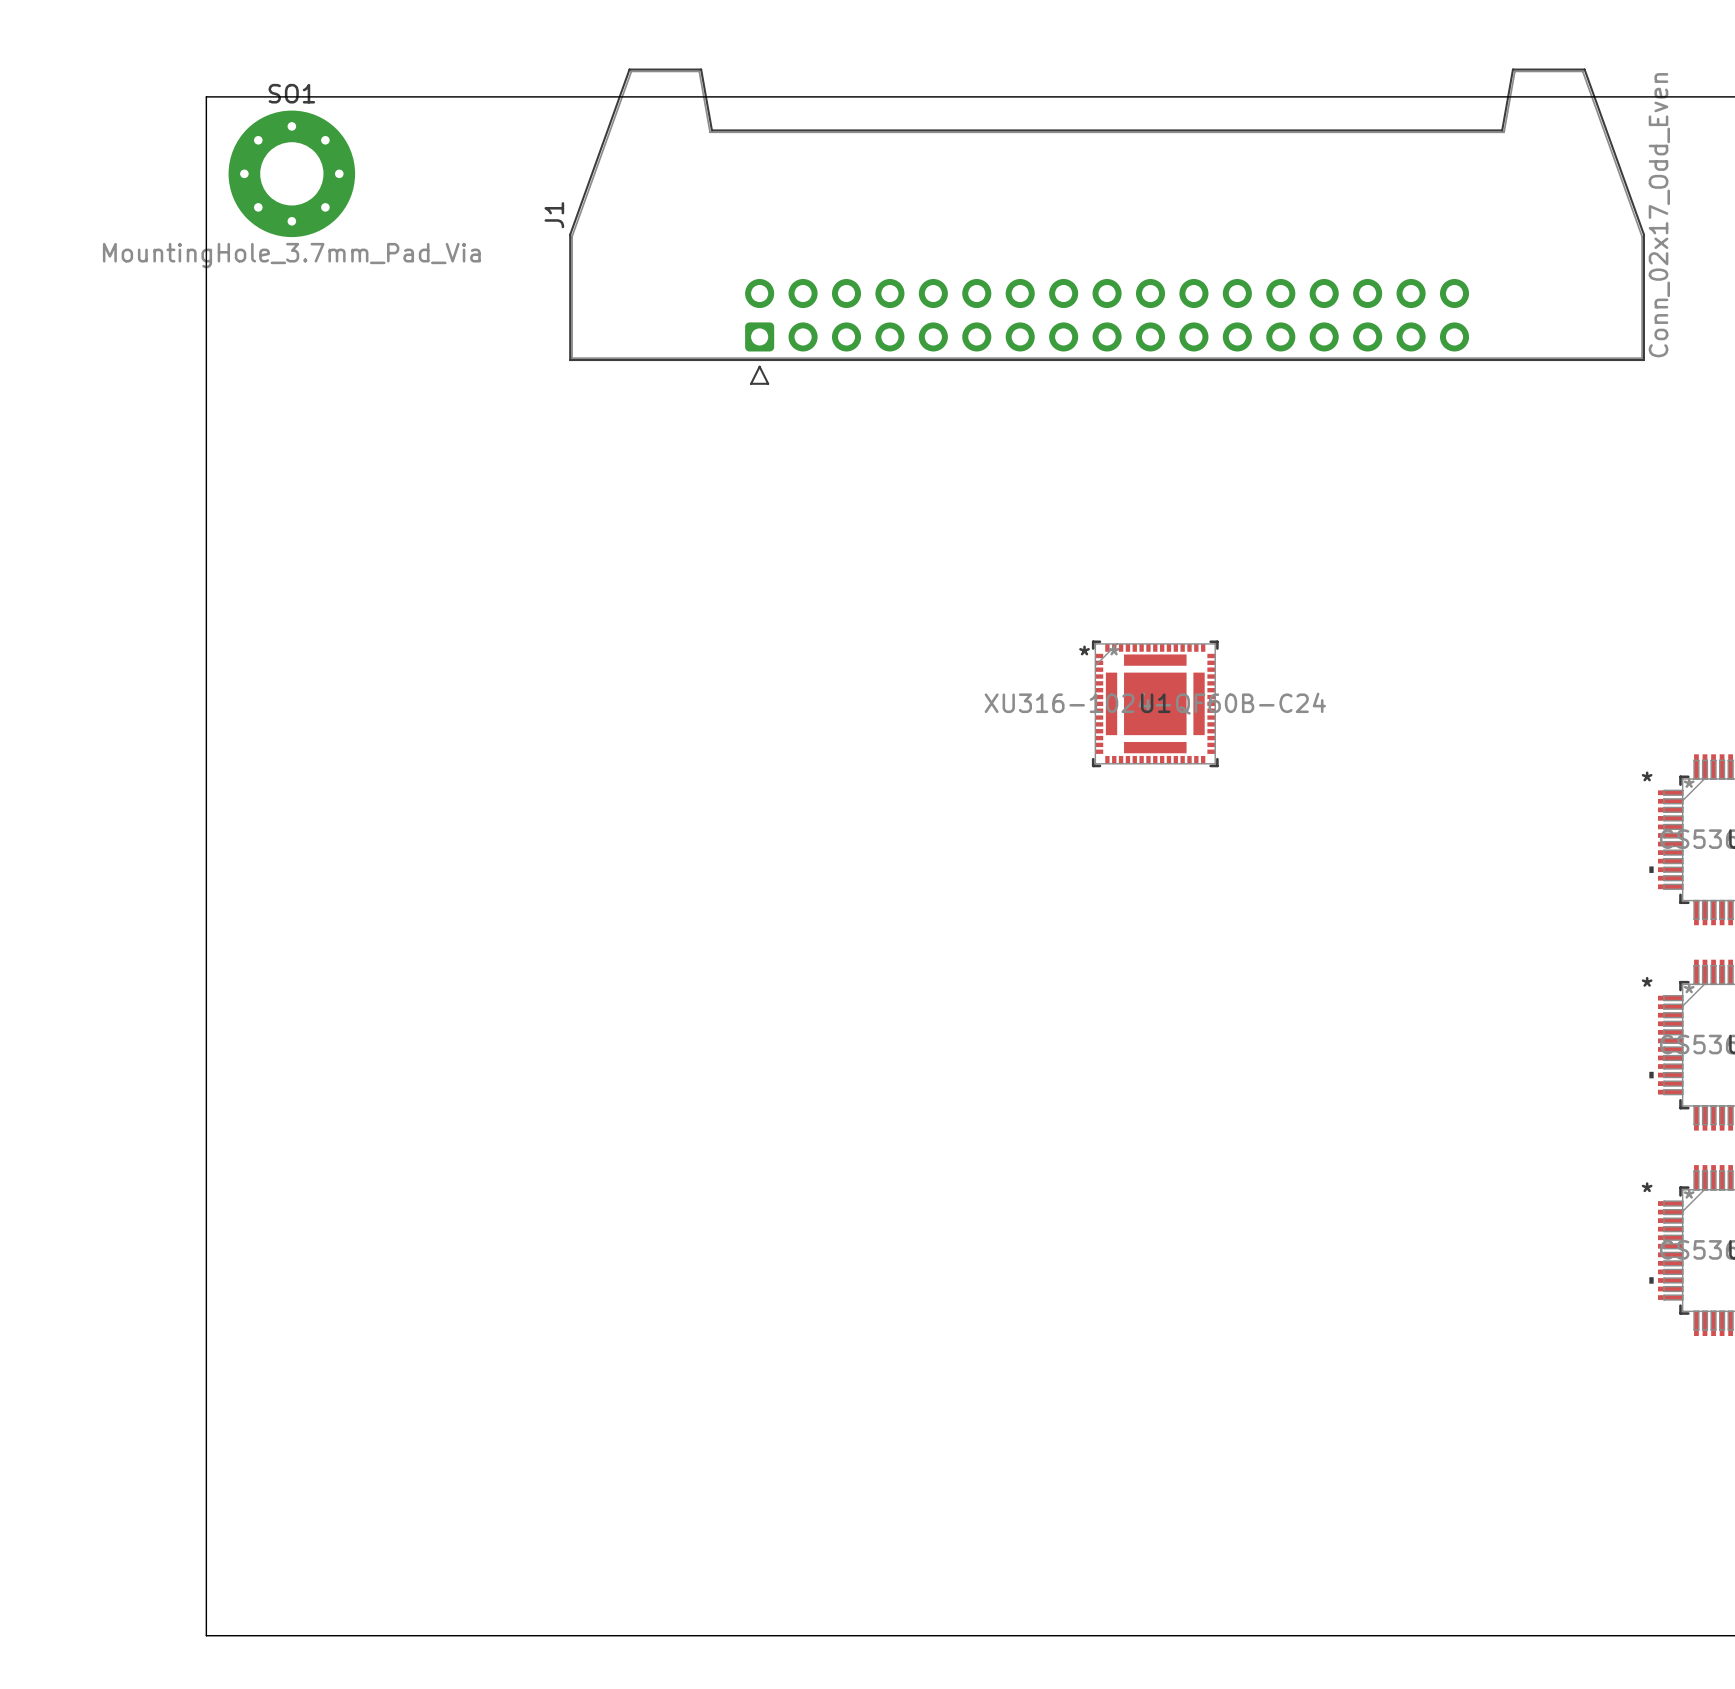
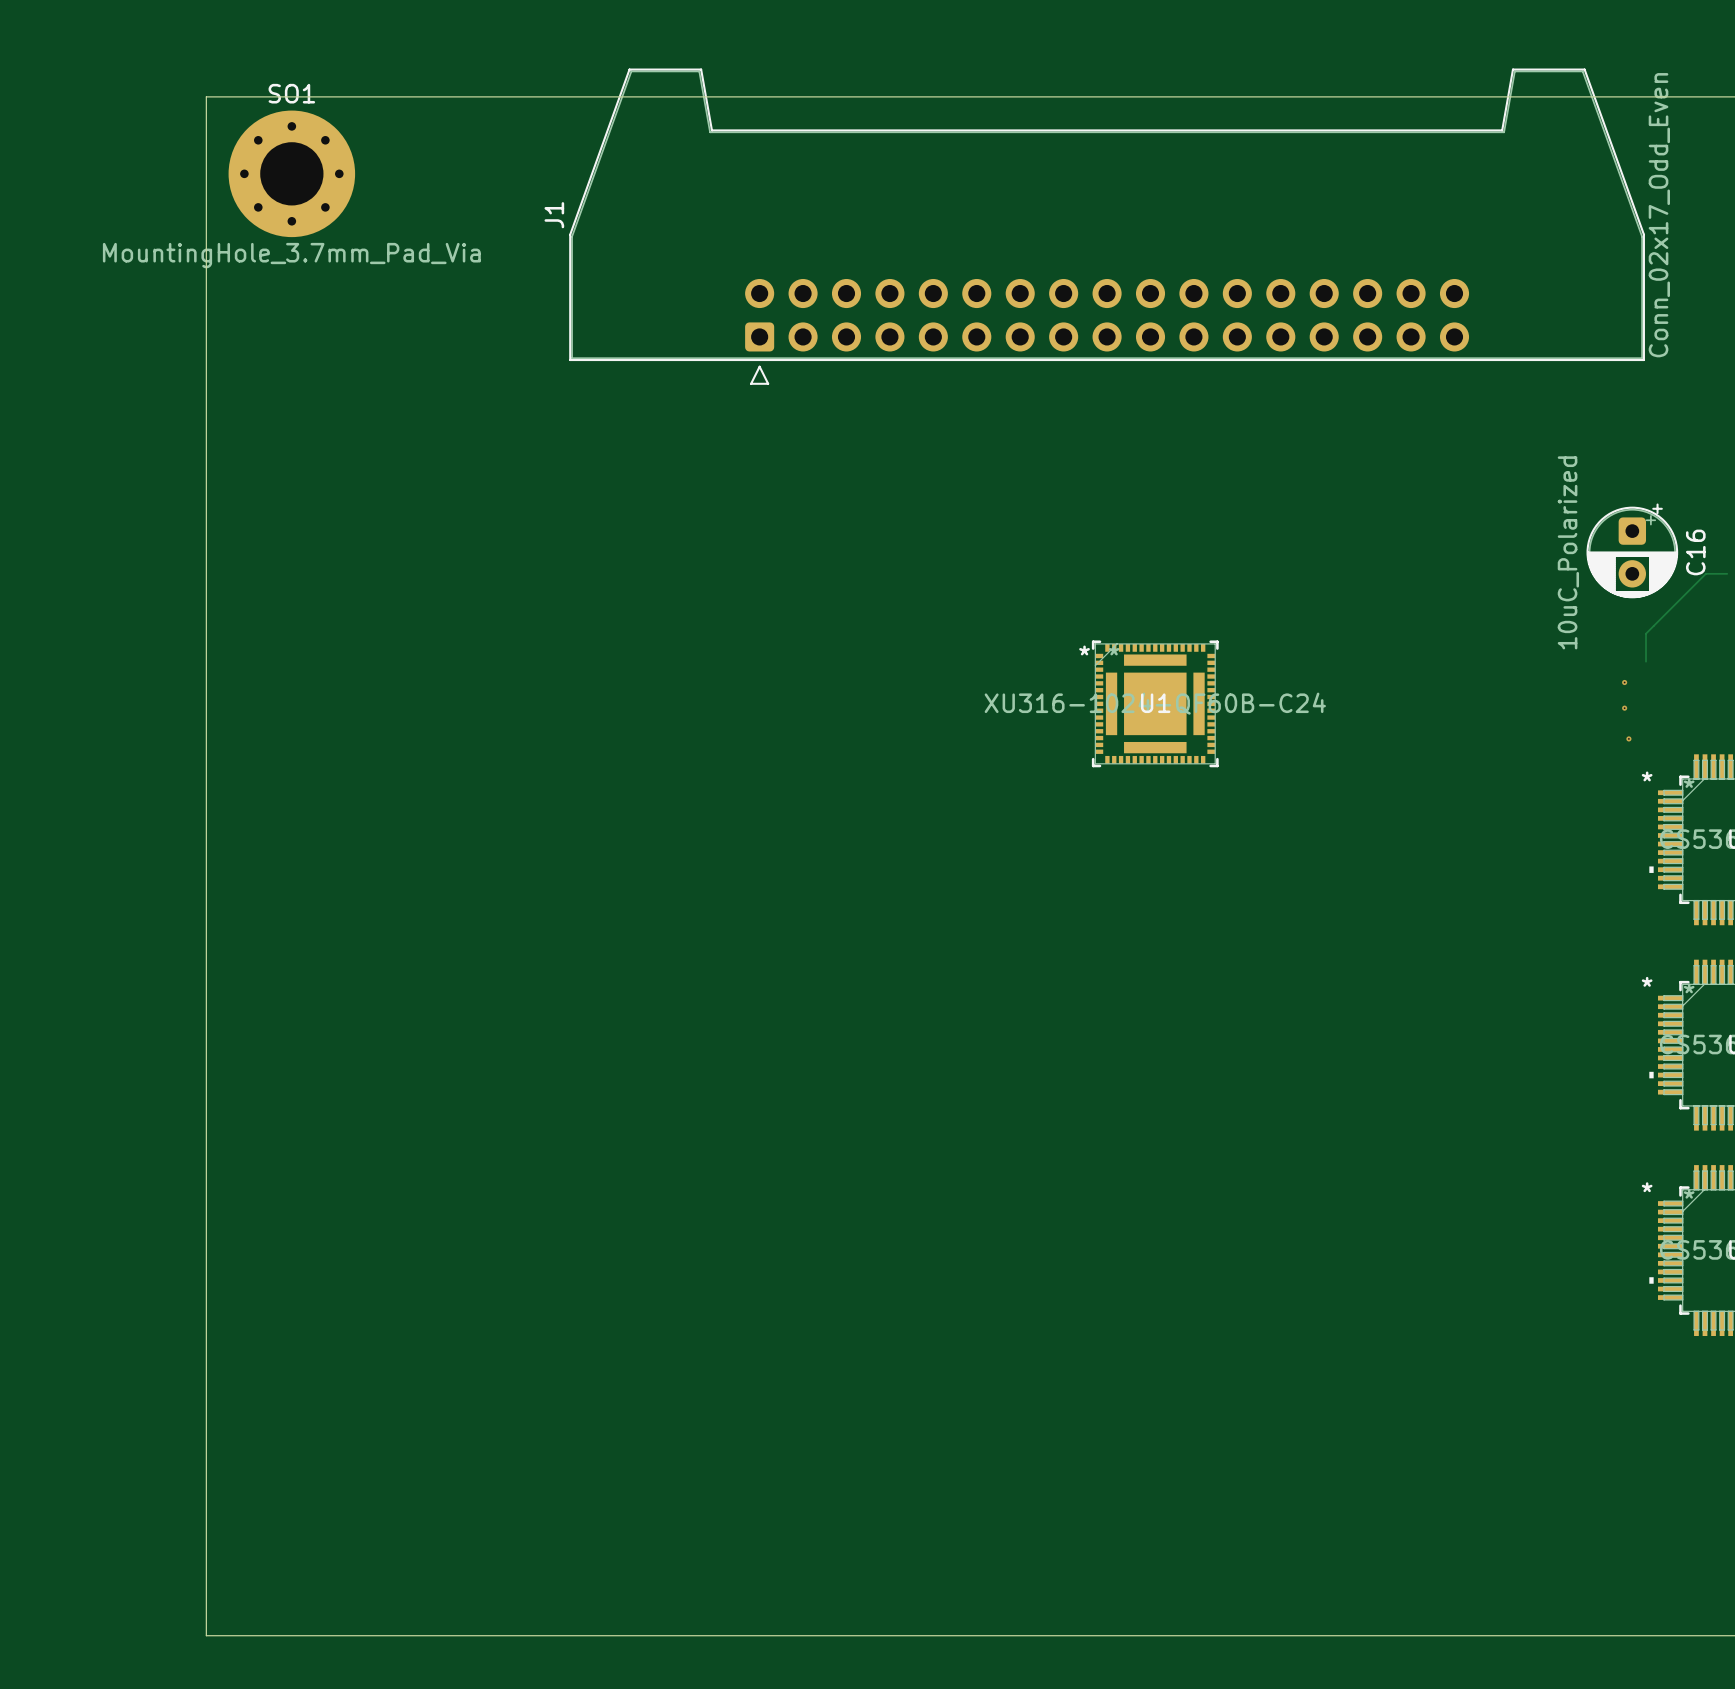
C16: none -> 10uC_Polarized (1632, 550)
track: none -> (1727, 573) (1705, 573) (1646, 633) (1646, 661)
via: none -> (1624, 682)
via: none -> (1624, 708)
via: none -> (1628, 738)

